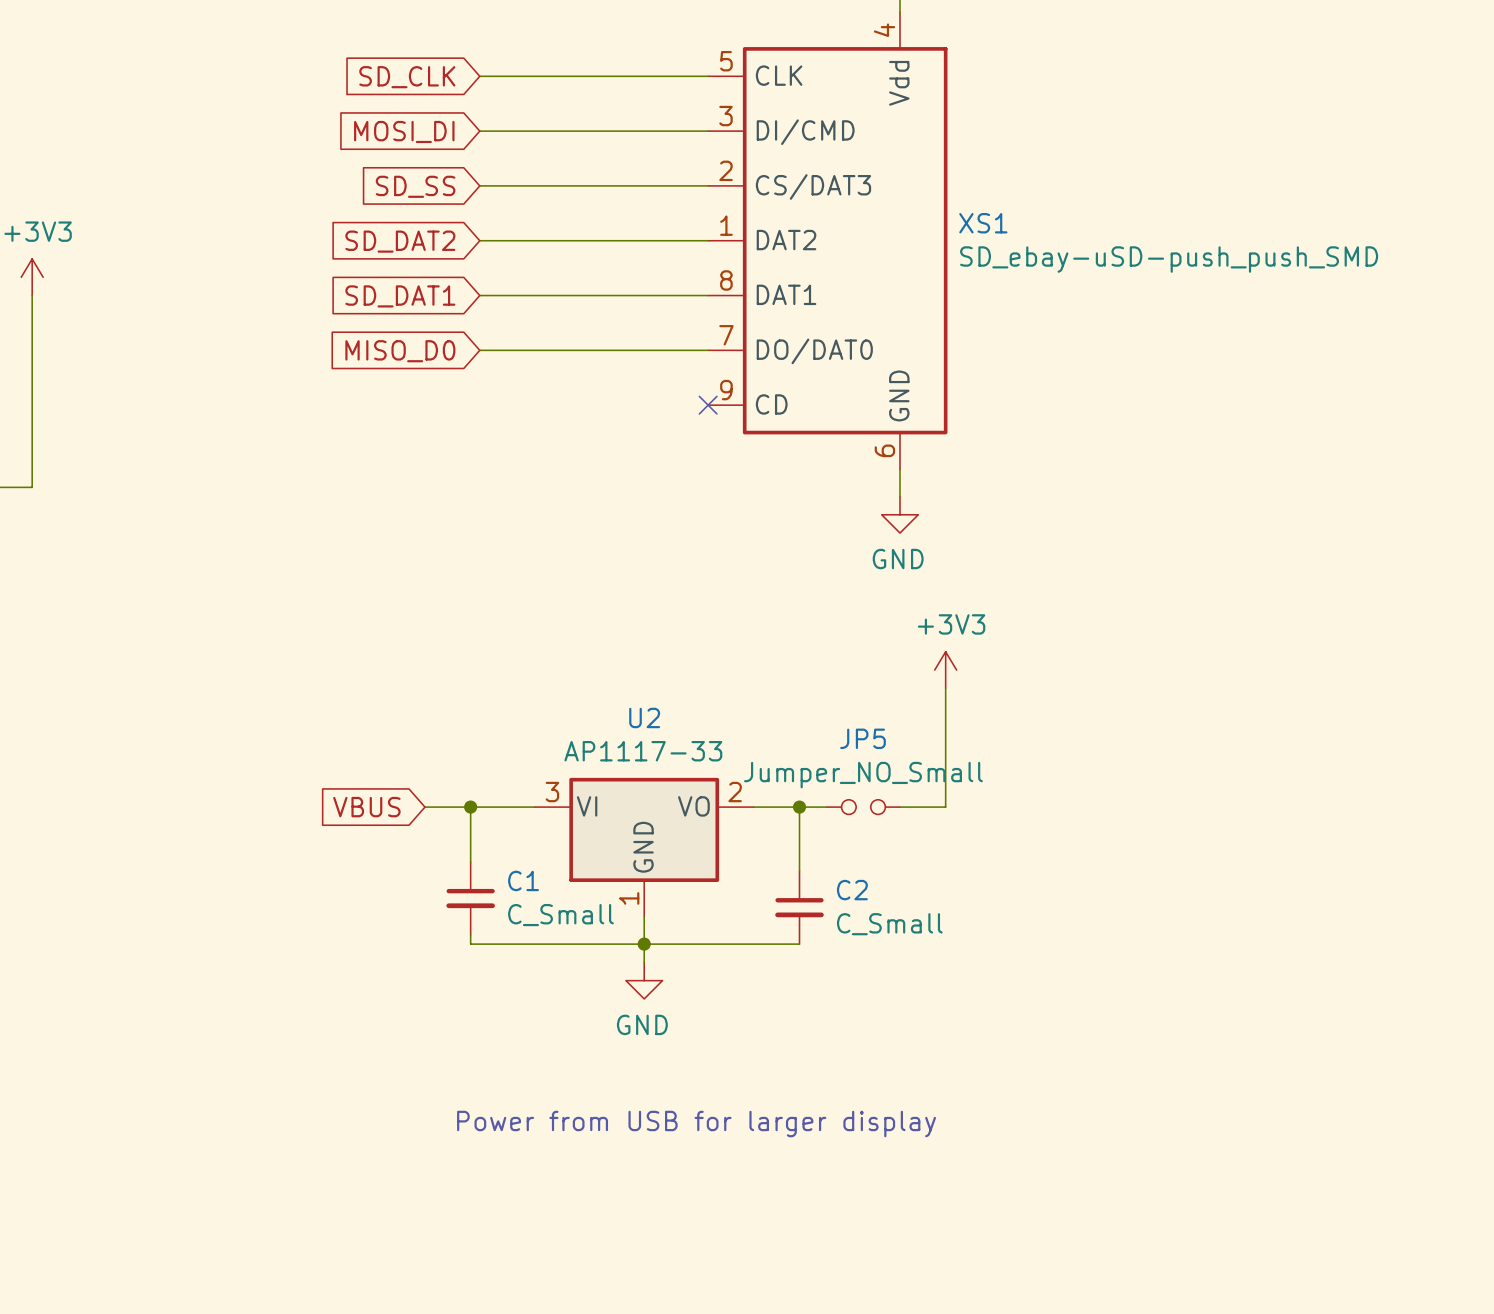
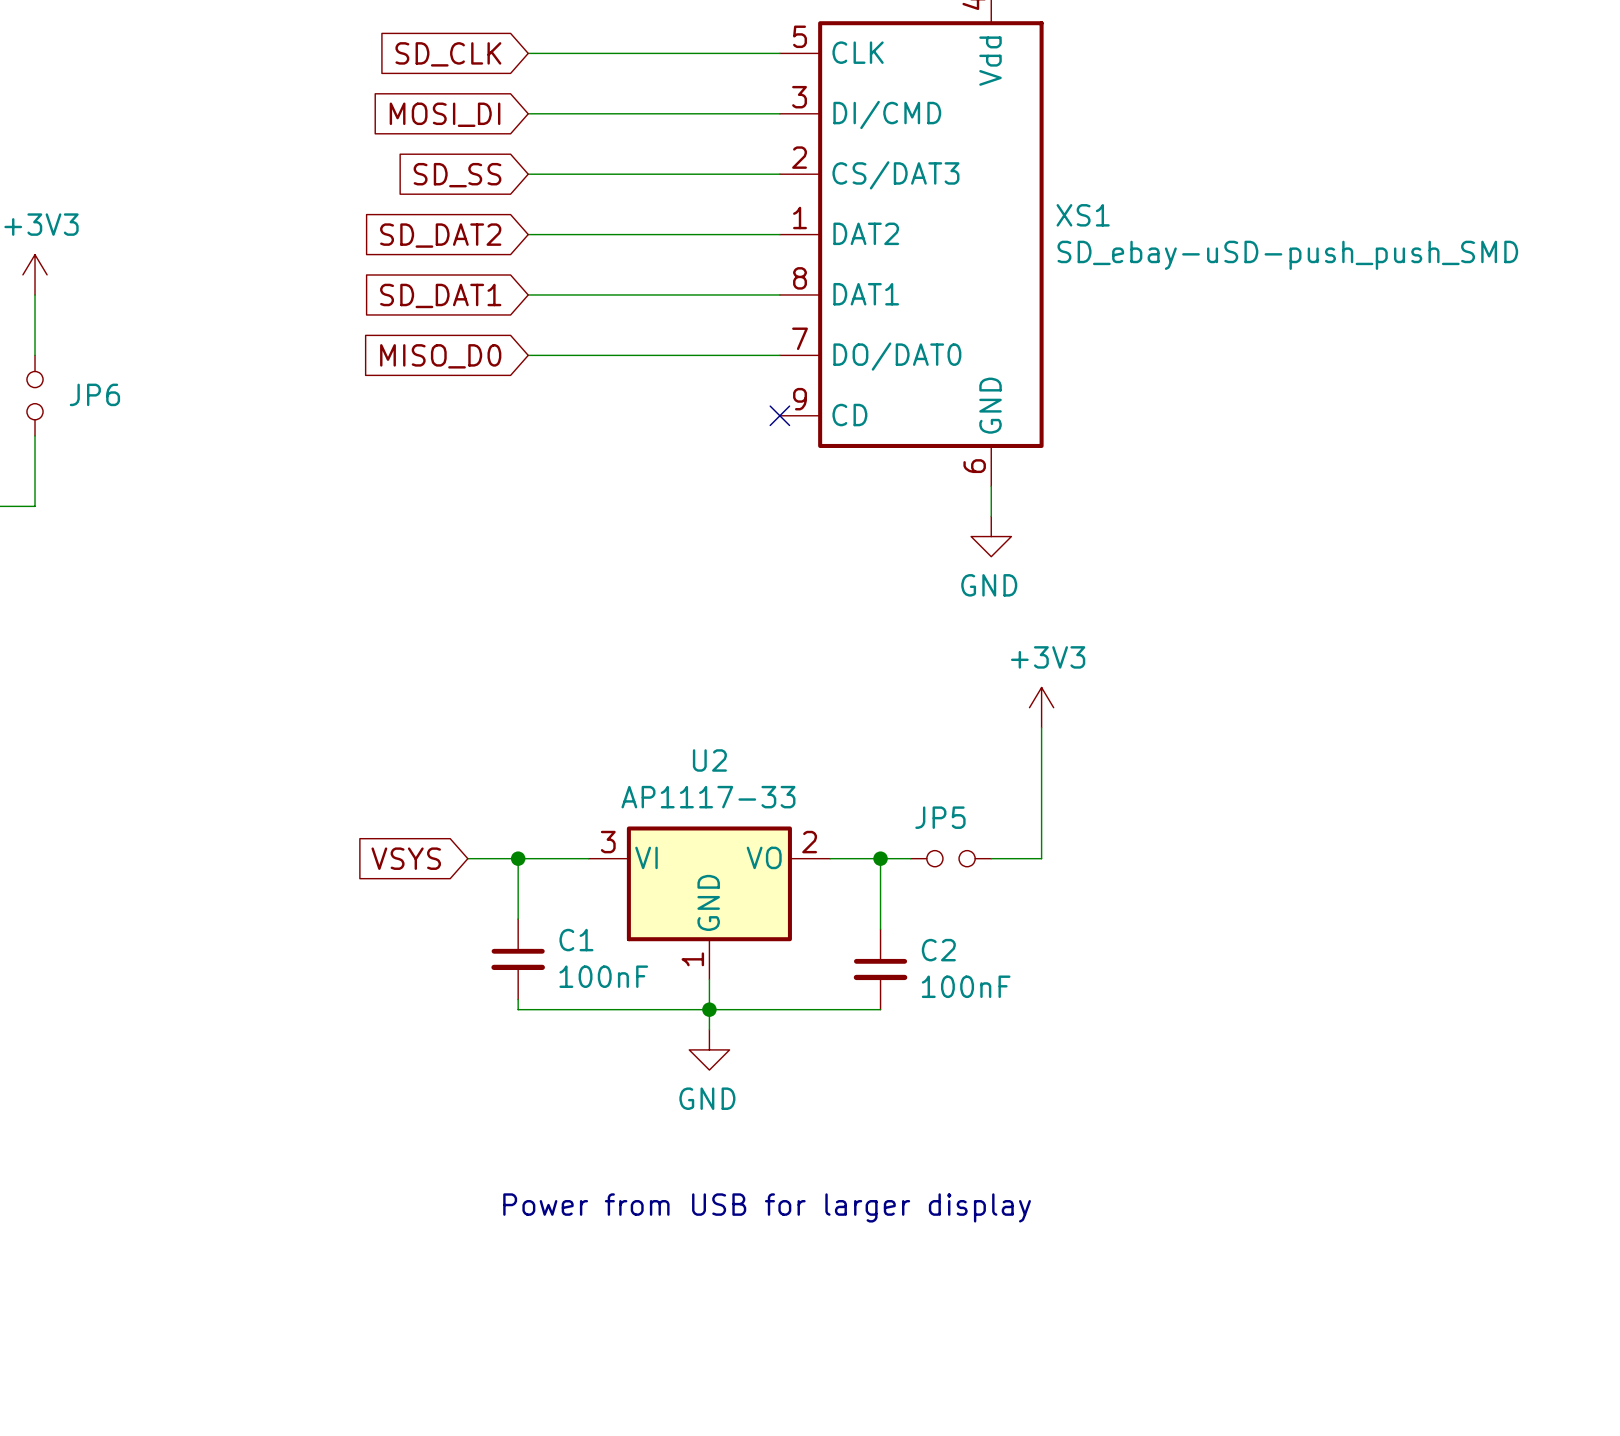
wire: (32, 350) (32, 423) -> none
JP6: none -> (35, 395)
JP5 name position: JP5 (863, 738) -> JP5 (940, 817)
JP5 value: Jumper_NO_Small (863, 775) -> none
global label: VBUS (366, 807) -> VSYS (406, 858)
C1 value: C_Small (560, 915) -> 100nF (603, 976)
C2 value: C_Small (889, 924) -> 100nF (966, 986)

